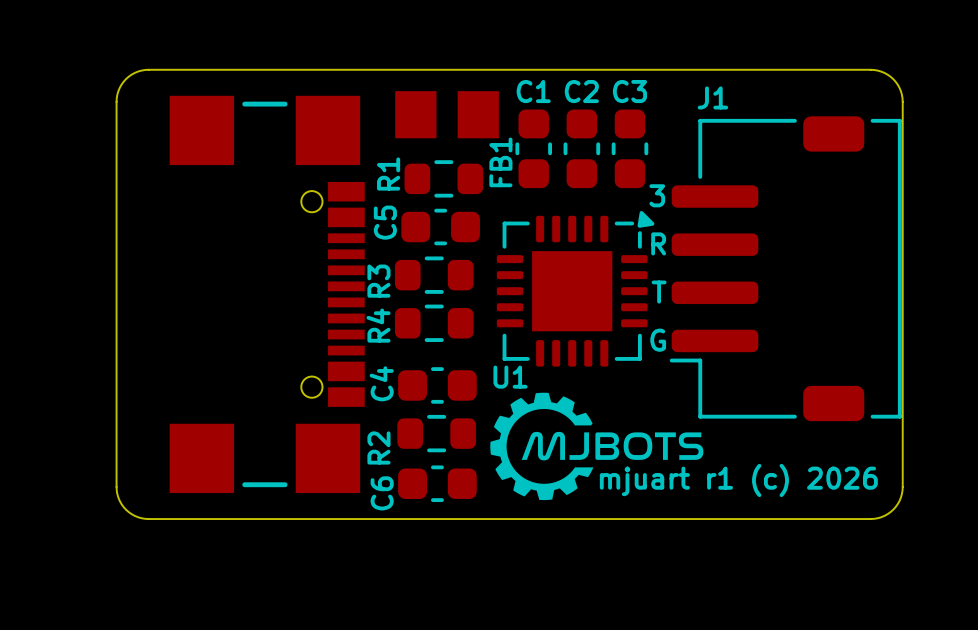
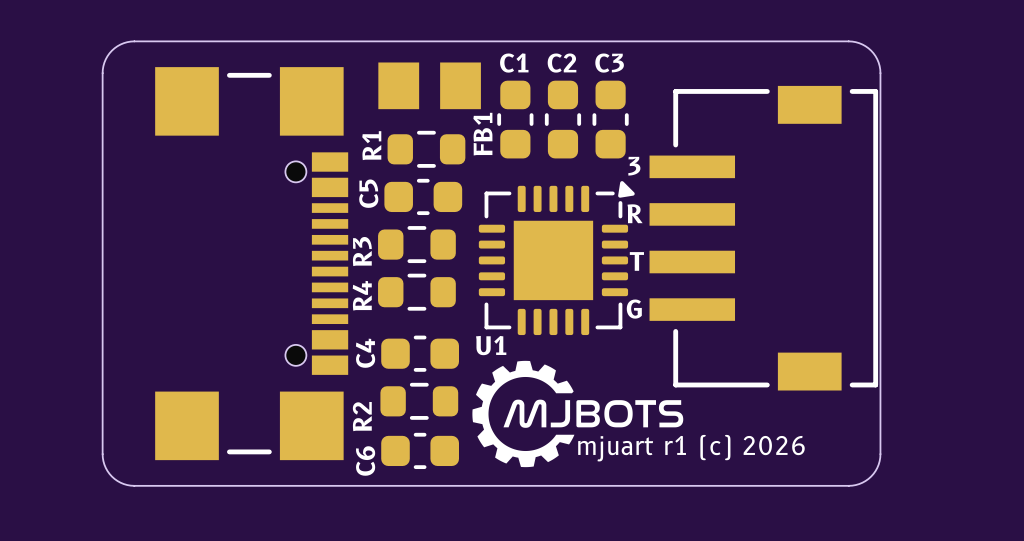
part: none -> (763, 238)
J1: (785, 268) -> none

